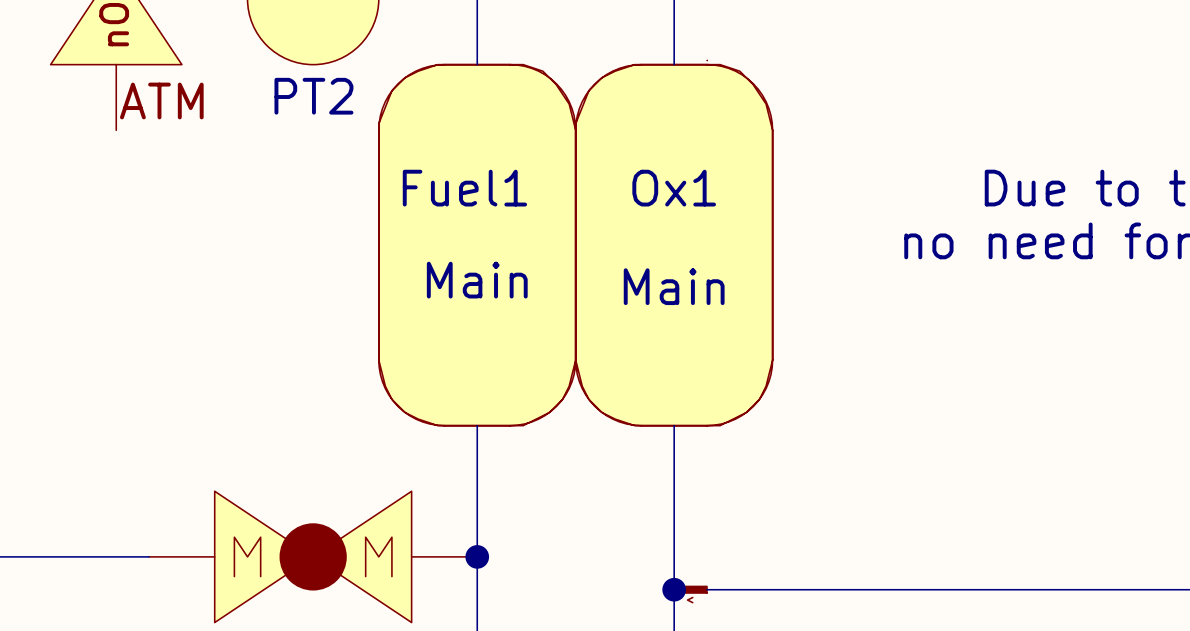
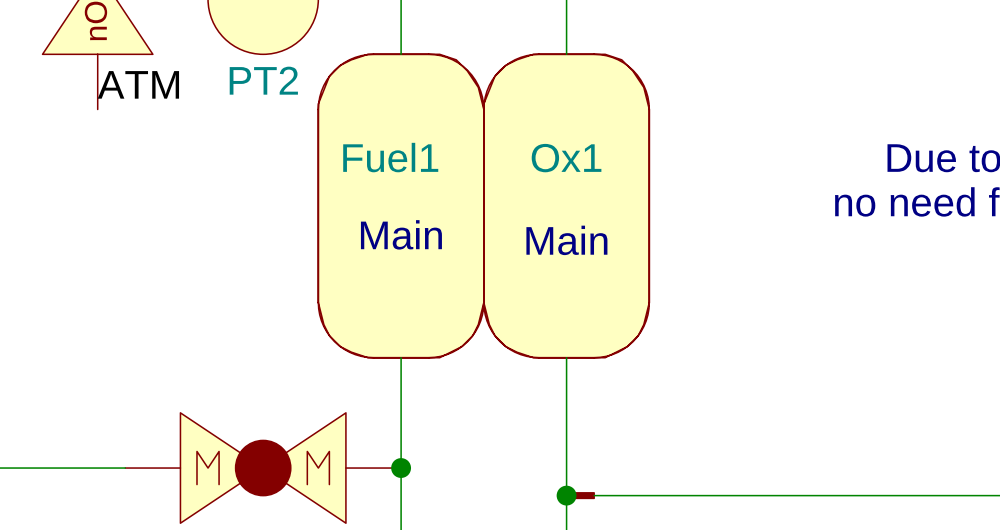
part symbol: [674, 586, 707, 604] -> [566, 492, 595, 499]

